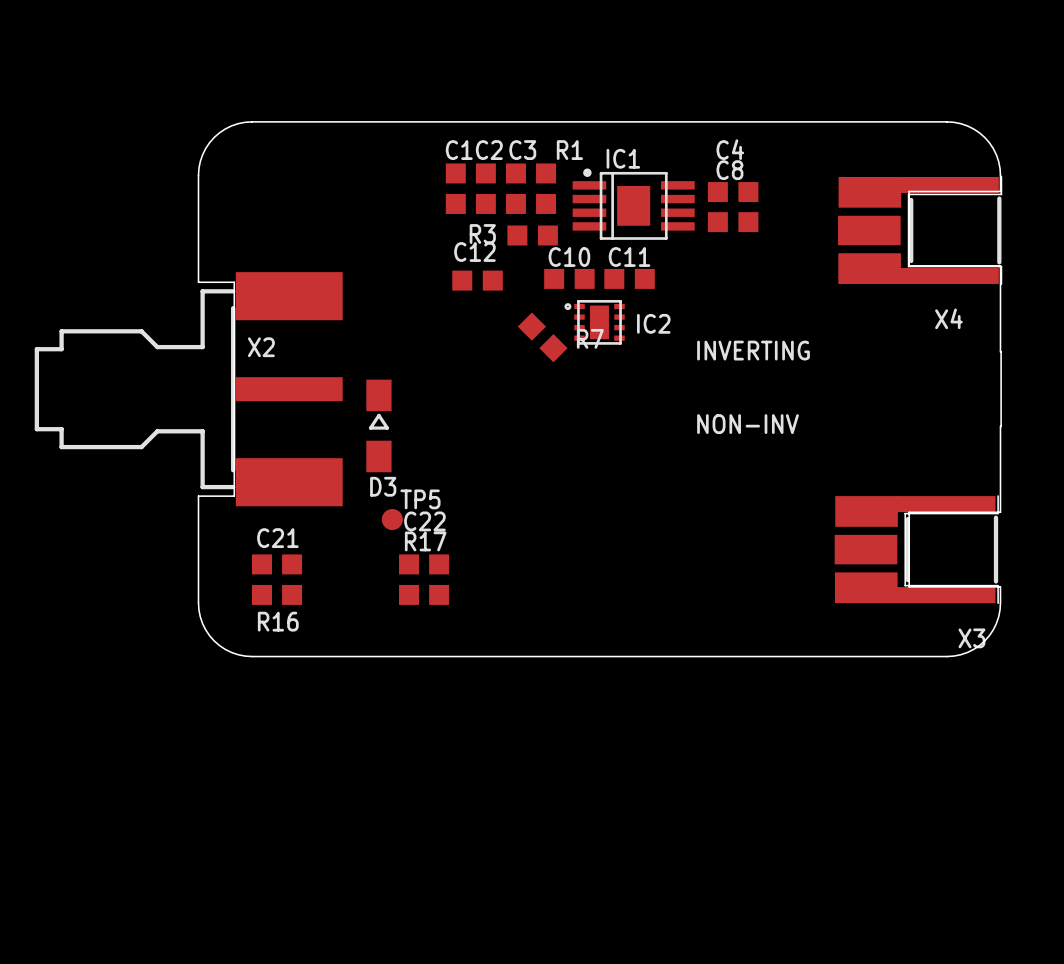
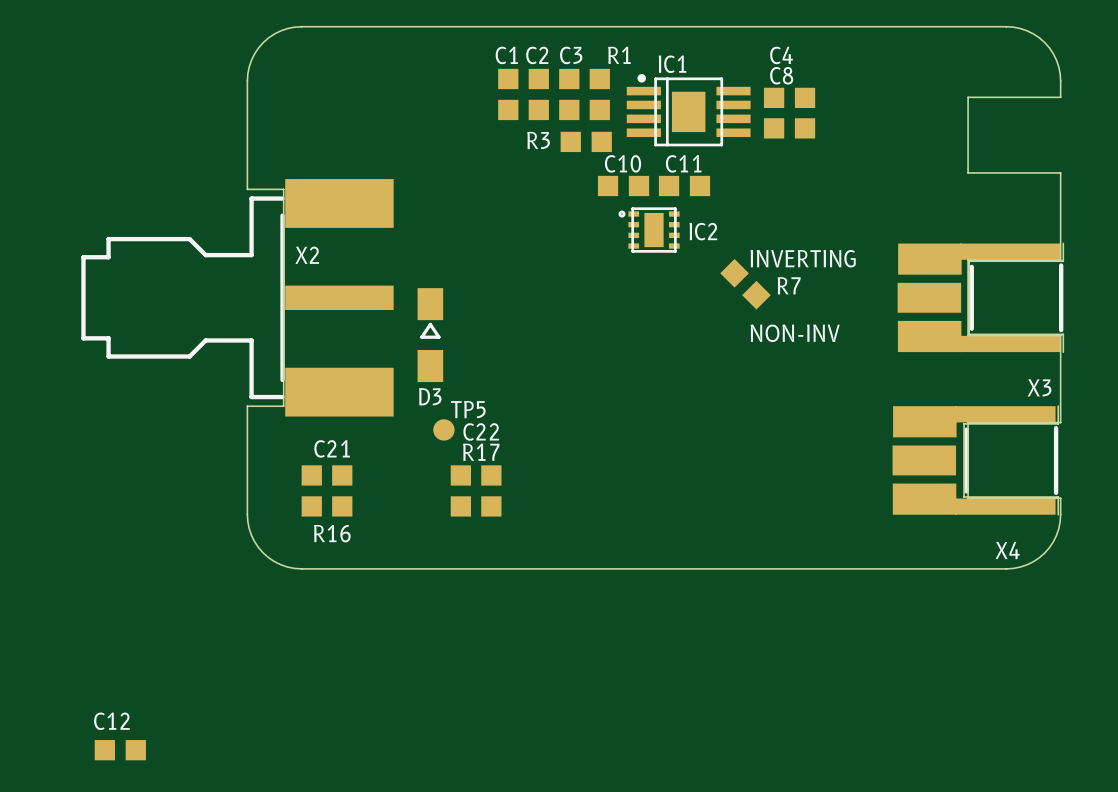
X4: (919, 230) -> none
C12 position: (477, 280) -> (120, 750)
R7 position: (542, 337) -> (745, 284)
board edge: (1000, 351) (1000, 426) -> (1060, 259) (968, 259) (968, 335) (1060, 335)
X3: none -> (980, 297)
X3 name: X3 (971, 638) -> X4 (1007, 550)

